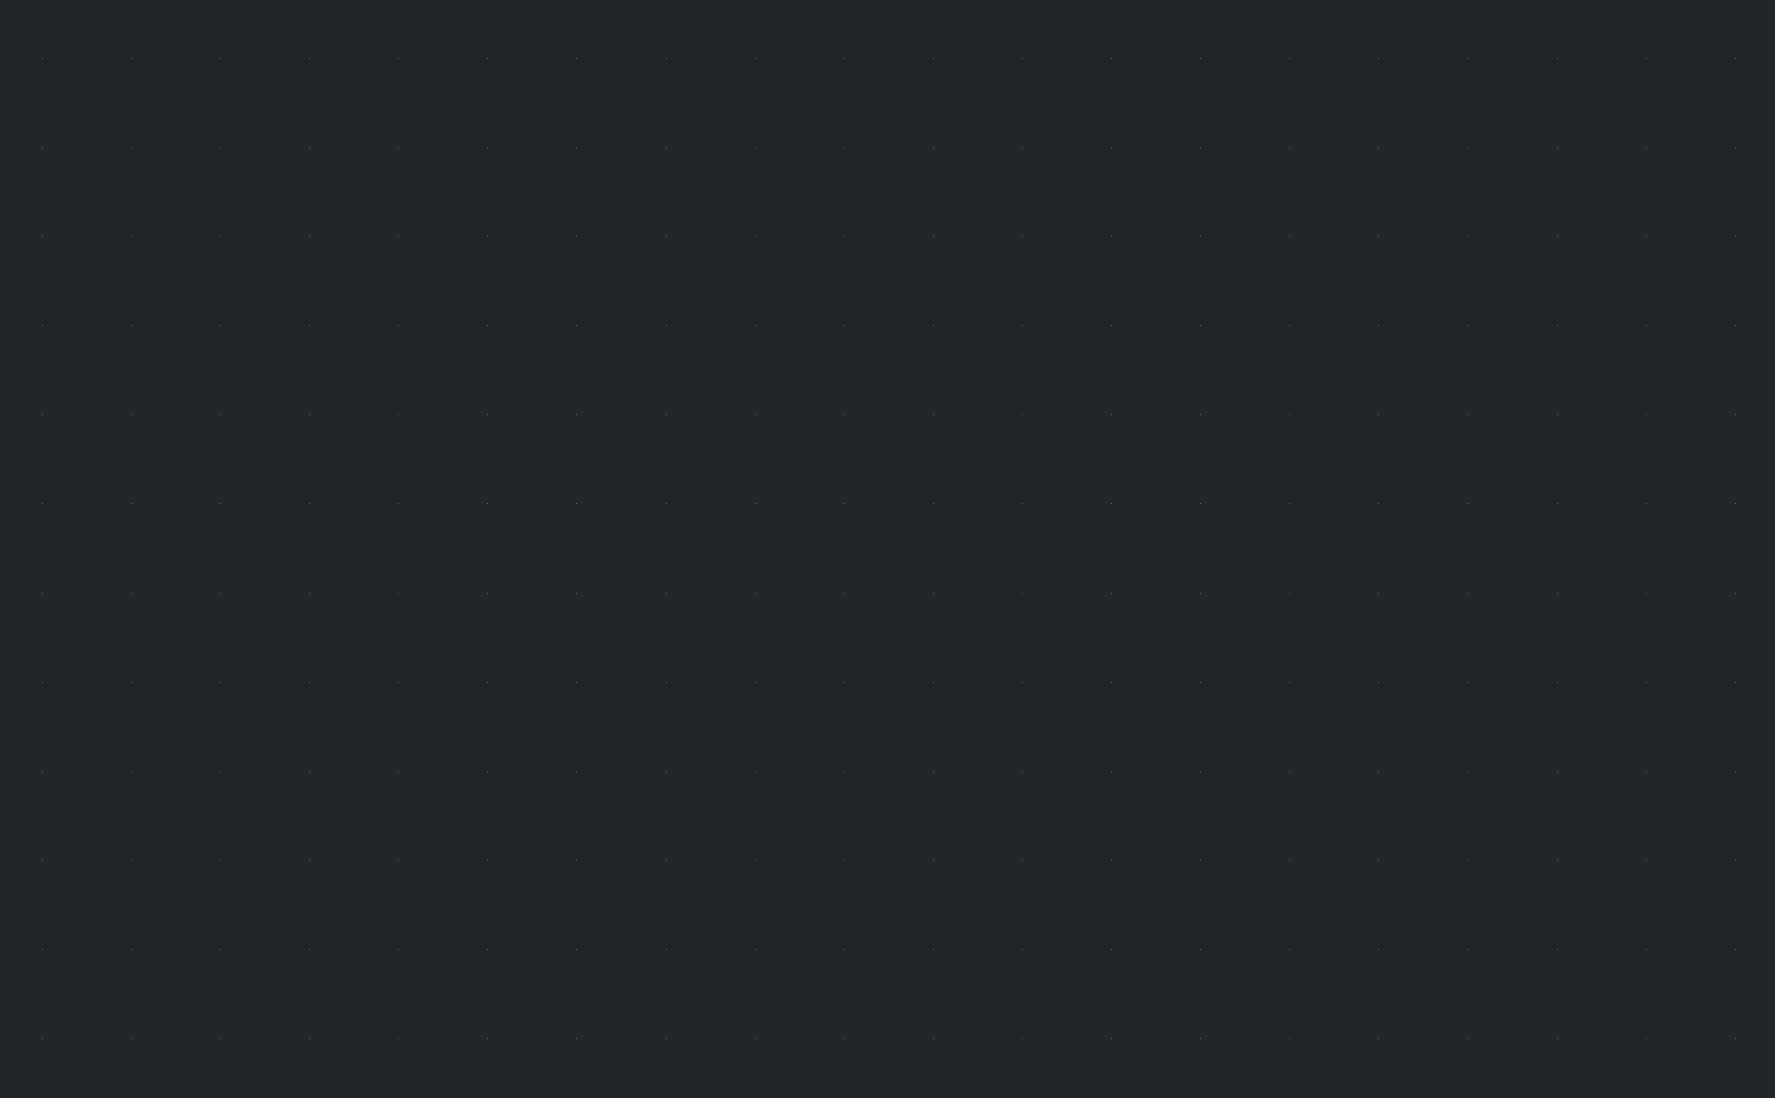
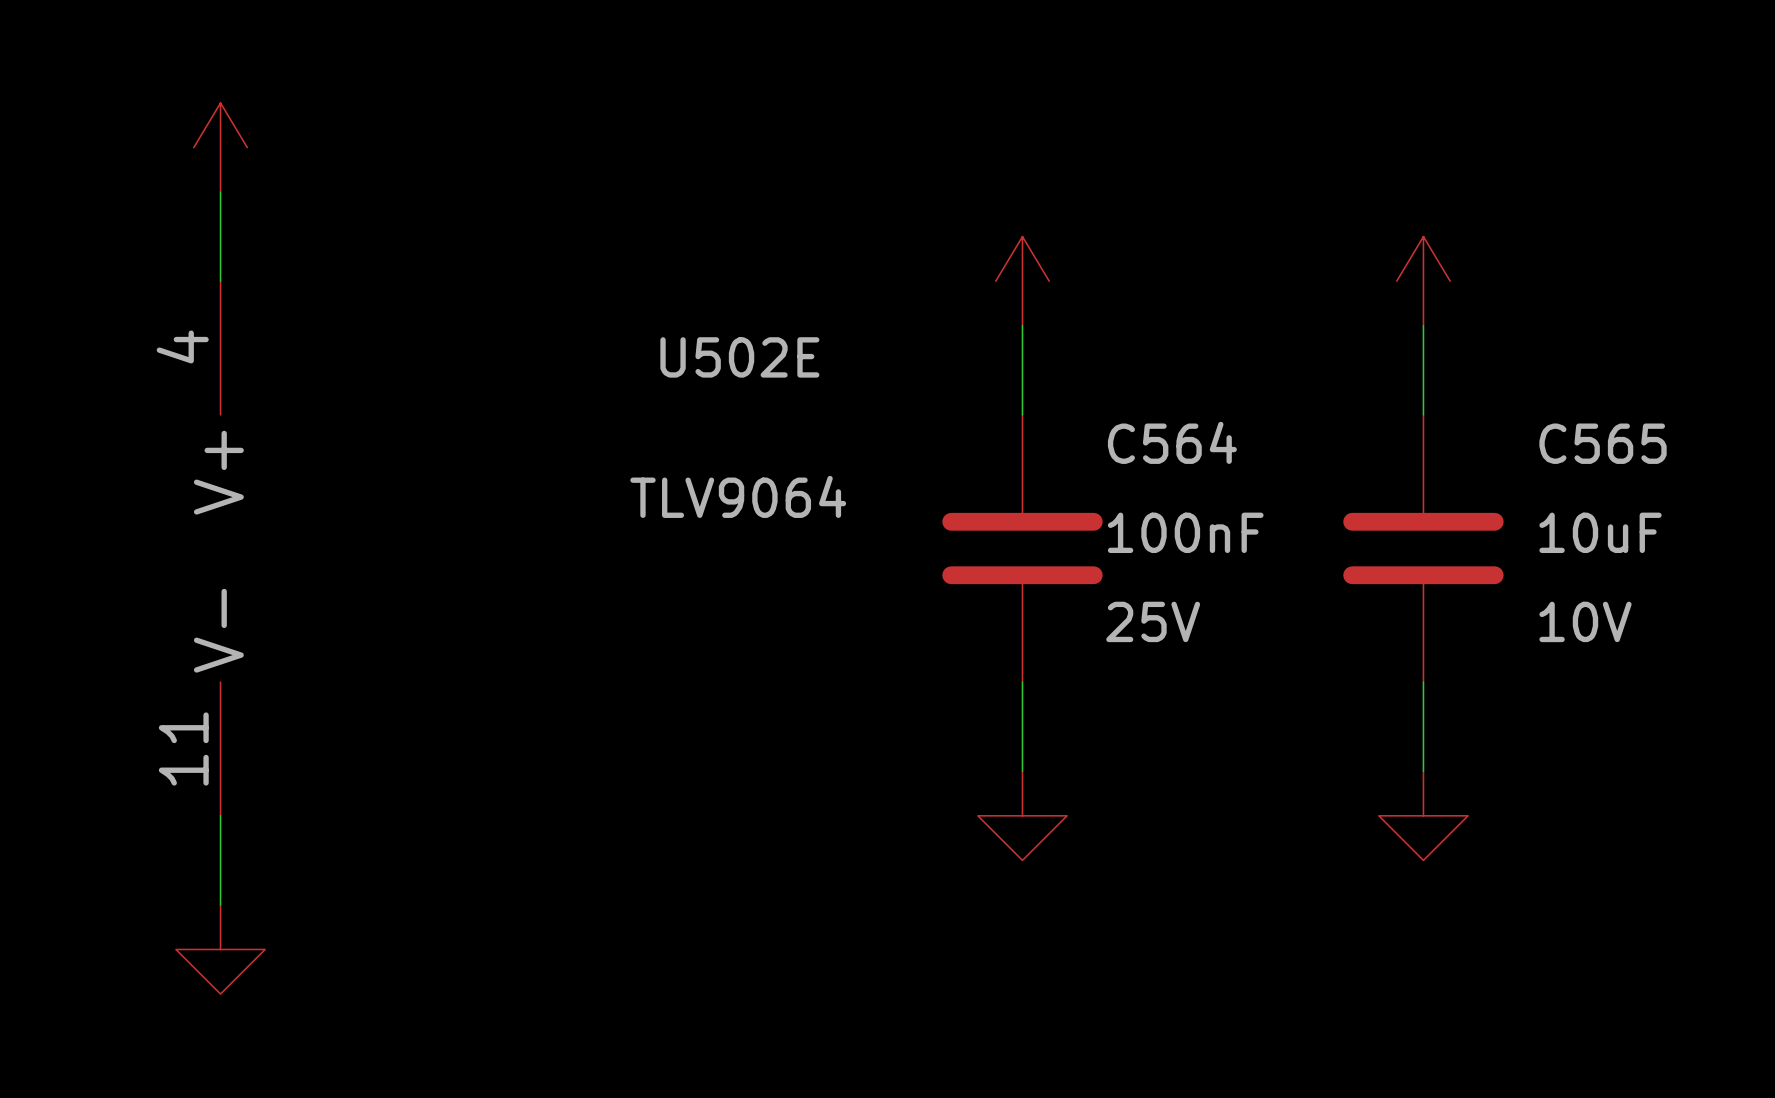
power symbol: none -> (220, 147)
wire: none -> (220, 192) (220, 281)
power symbol: none -> (1022, 281)
power symbol: none -> (1423, 281)
wire: none -> (1022, 325) (1022, 414)
wire: none -> (1423, 325) (1423, 414)
U502E: none -> TLV9064 (220, 548)
C564: none -> 100nF (1022, 548)
C565: none -> 10uF (1423, 548)
wire: none -> (1022, 682) (1022, 771)
wire: none -> (1423, 682) (1423, 771)
wire: none -> (220, 815) (220, 904)
power symbol: none -> (1022, 815)
power symbol: none -> (1423, 815)
power symbol: none -> (220, 949)

